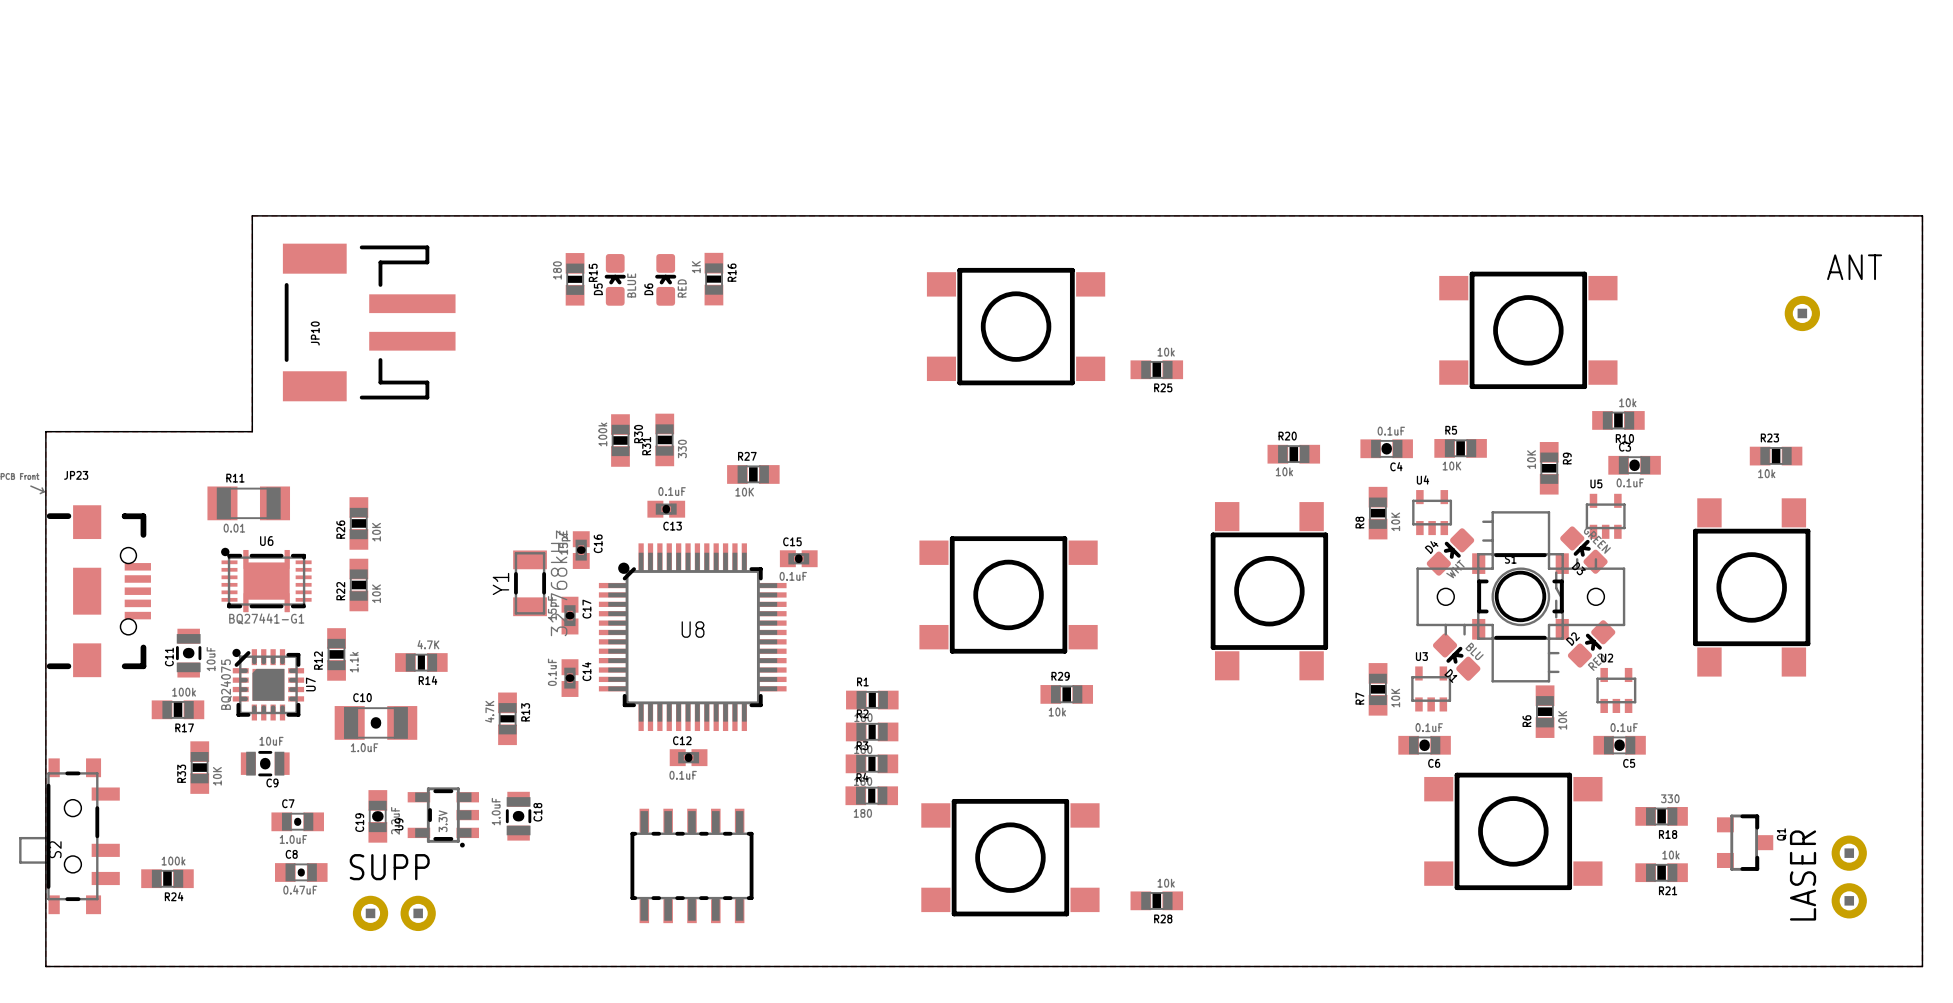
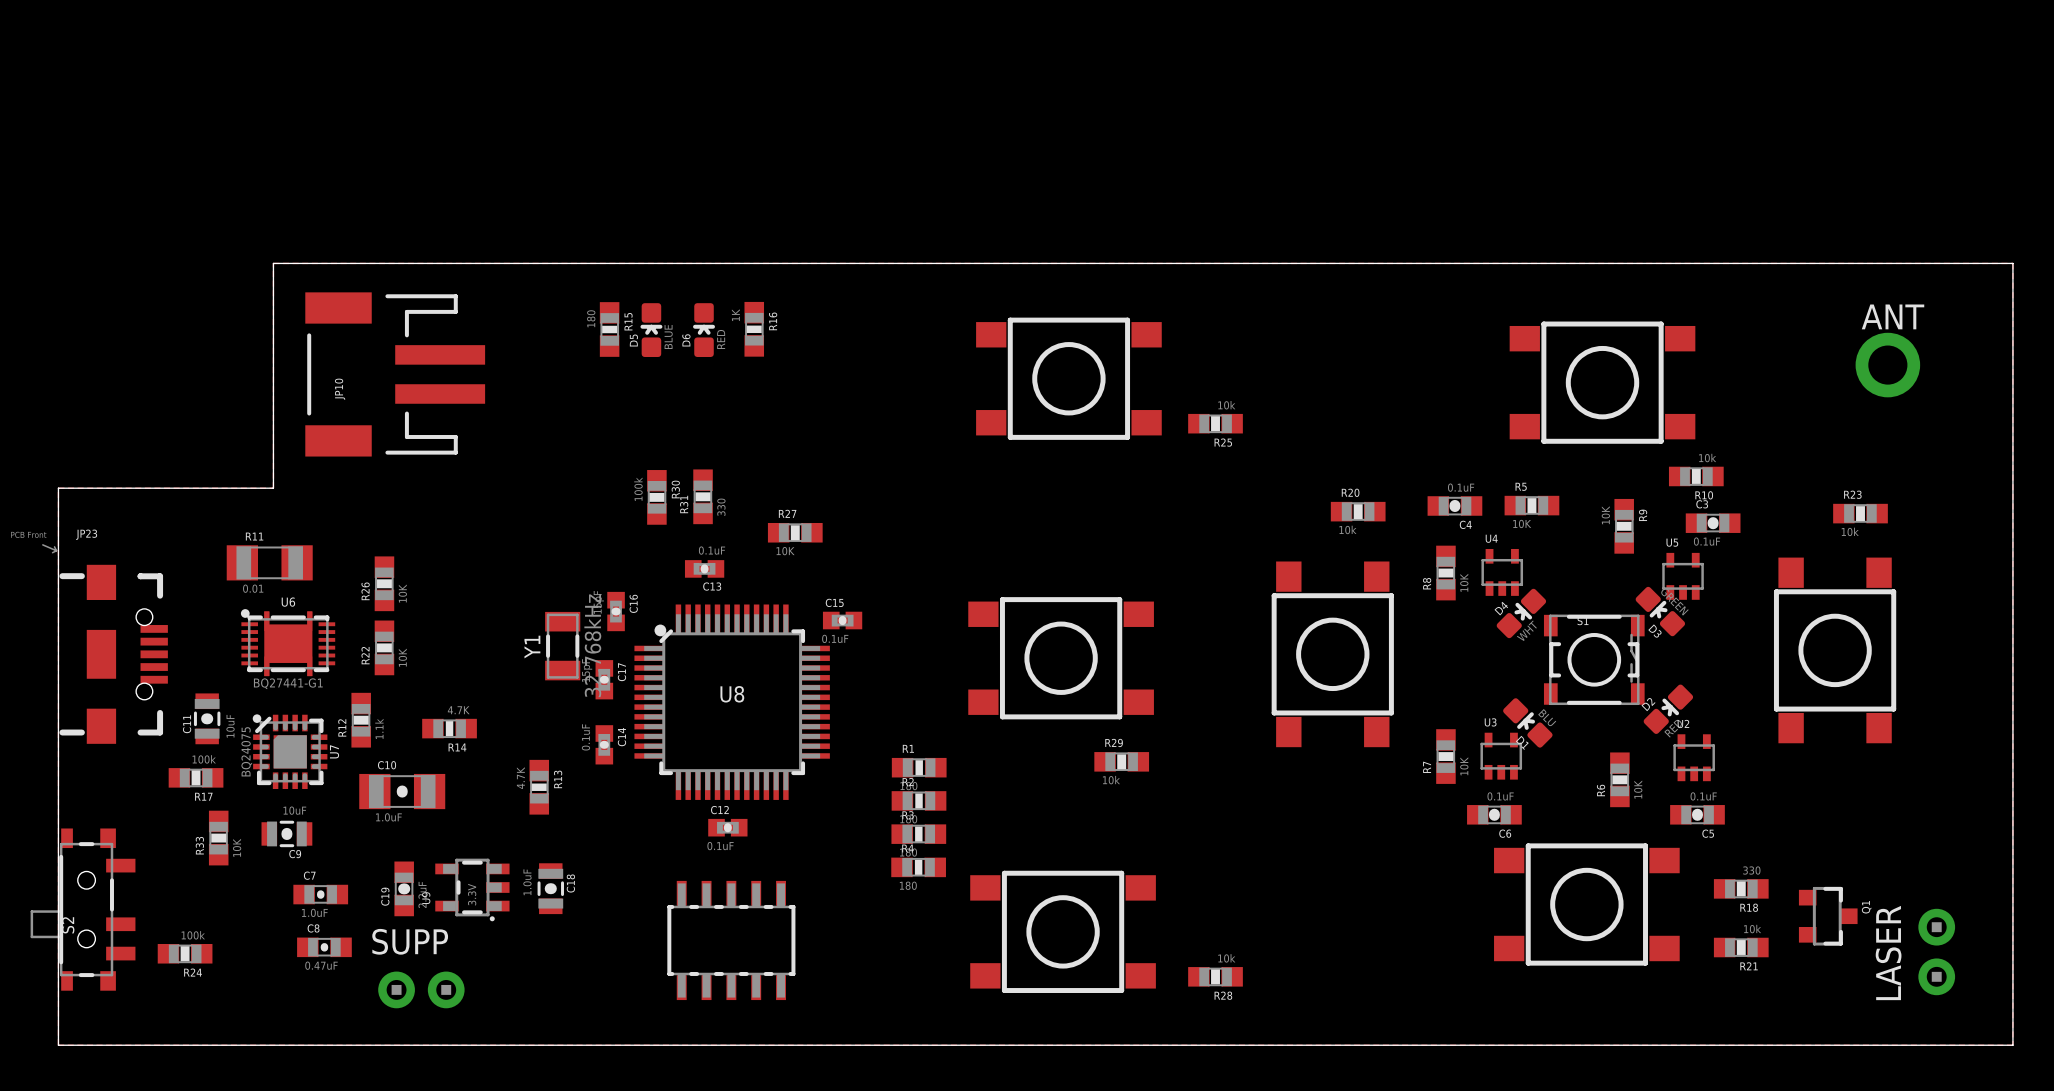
ANT name position: ANT (1854, 267) -> ANT (1893, 316)
ANT footprint: [1784, 295, 1820, 332] -> [1855, 332, 1921, 398]
part: (1520, 596) -> none

